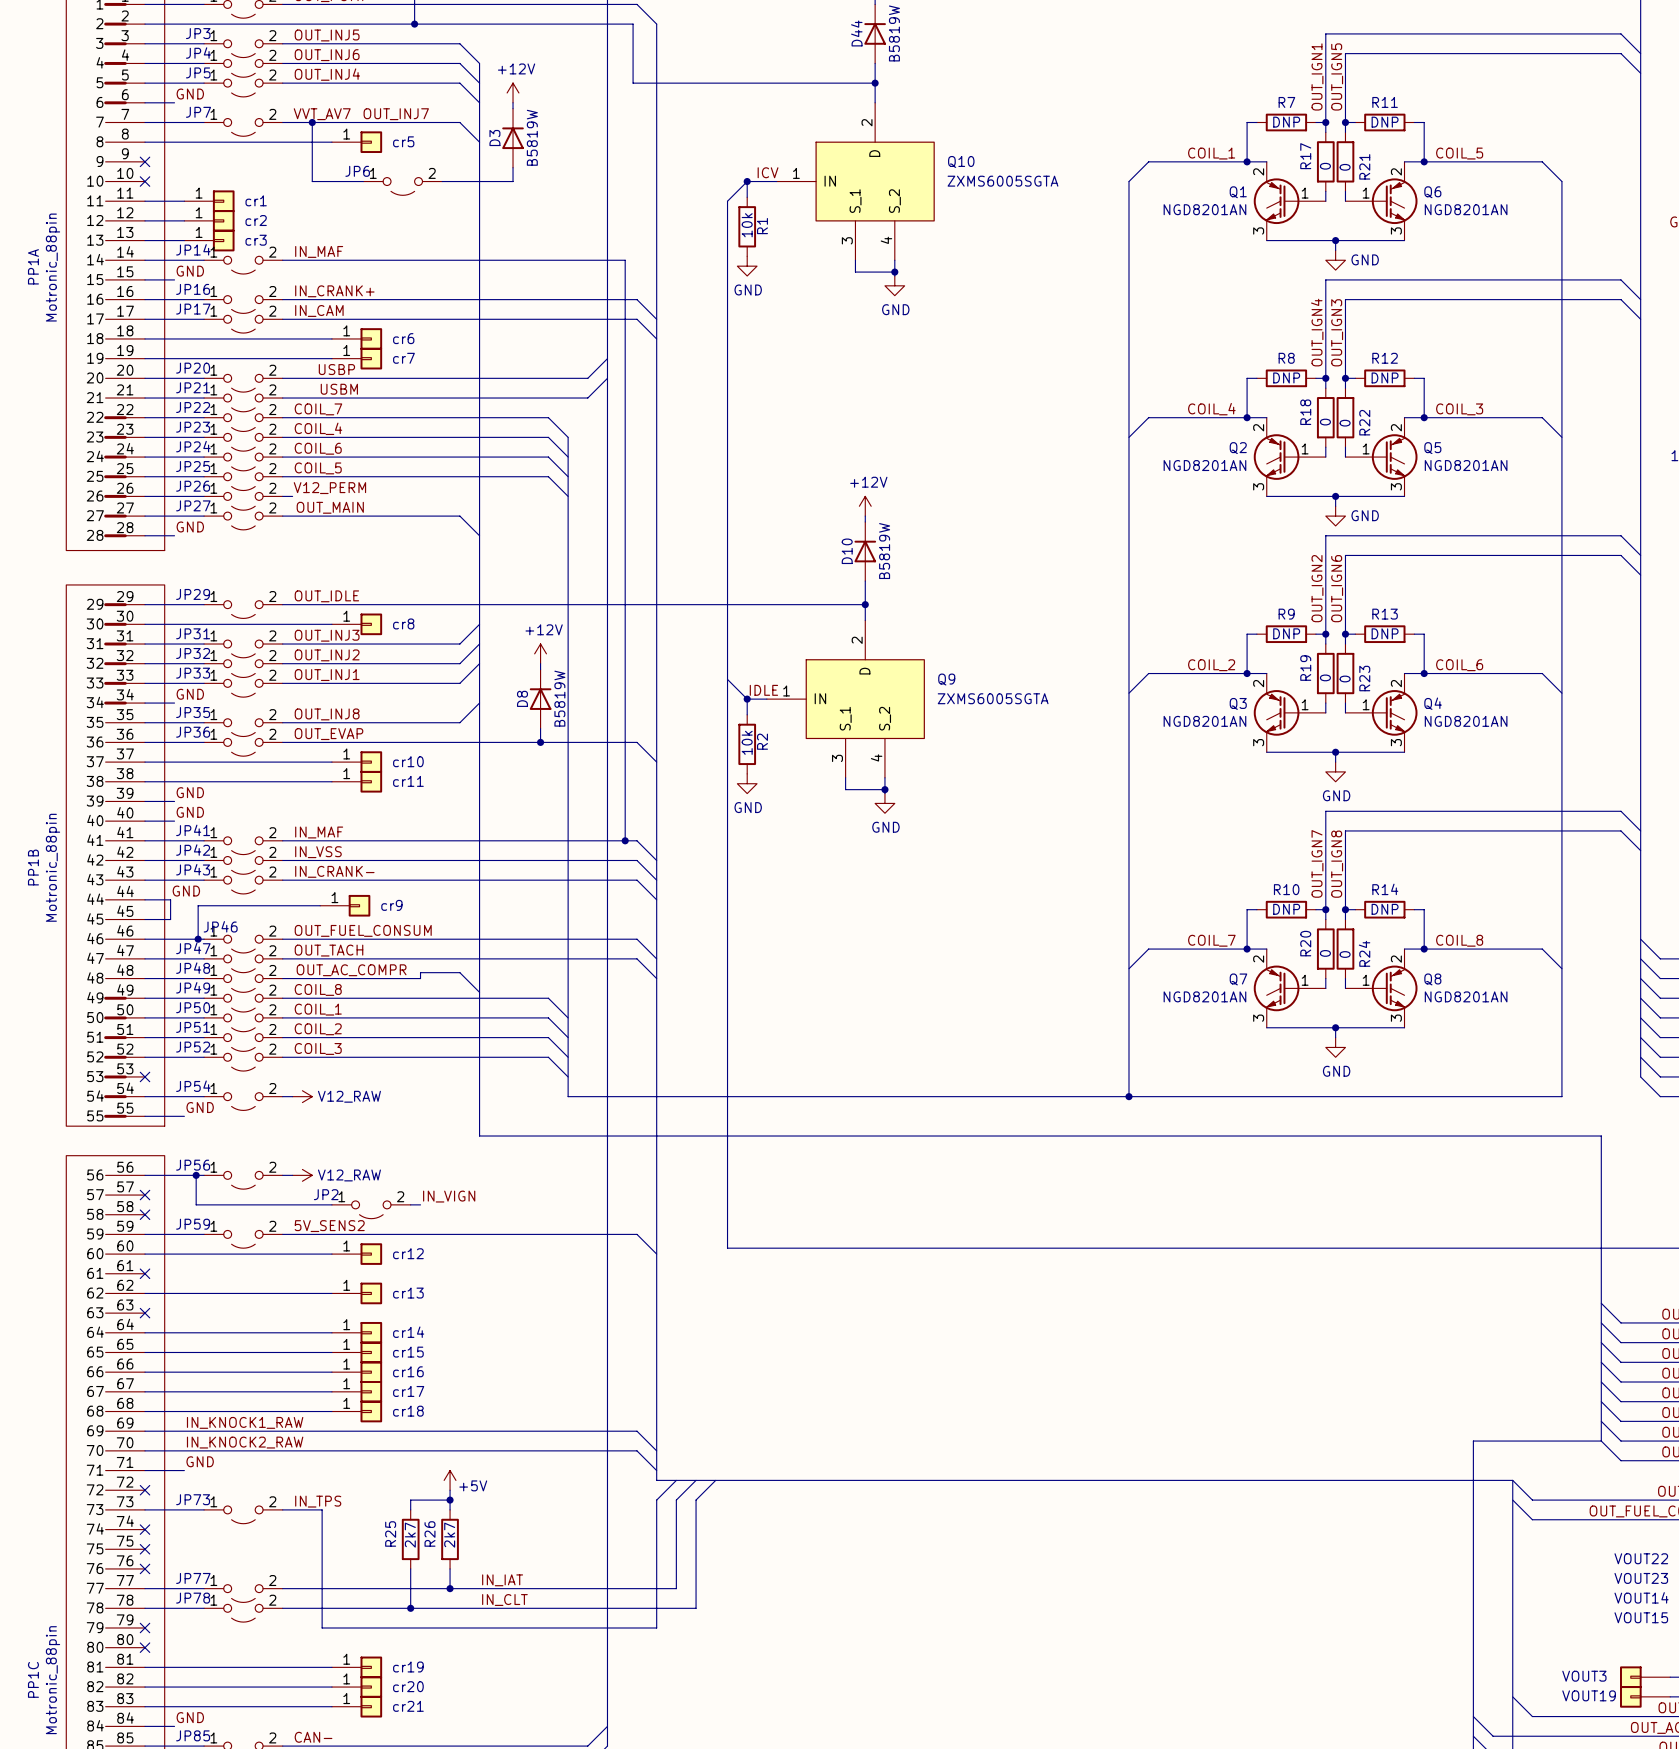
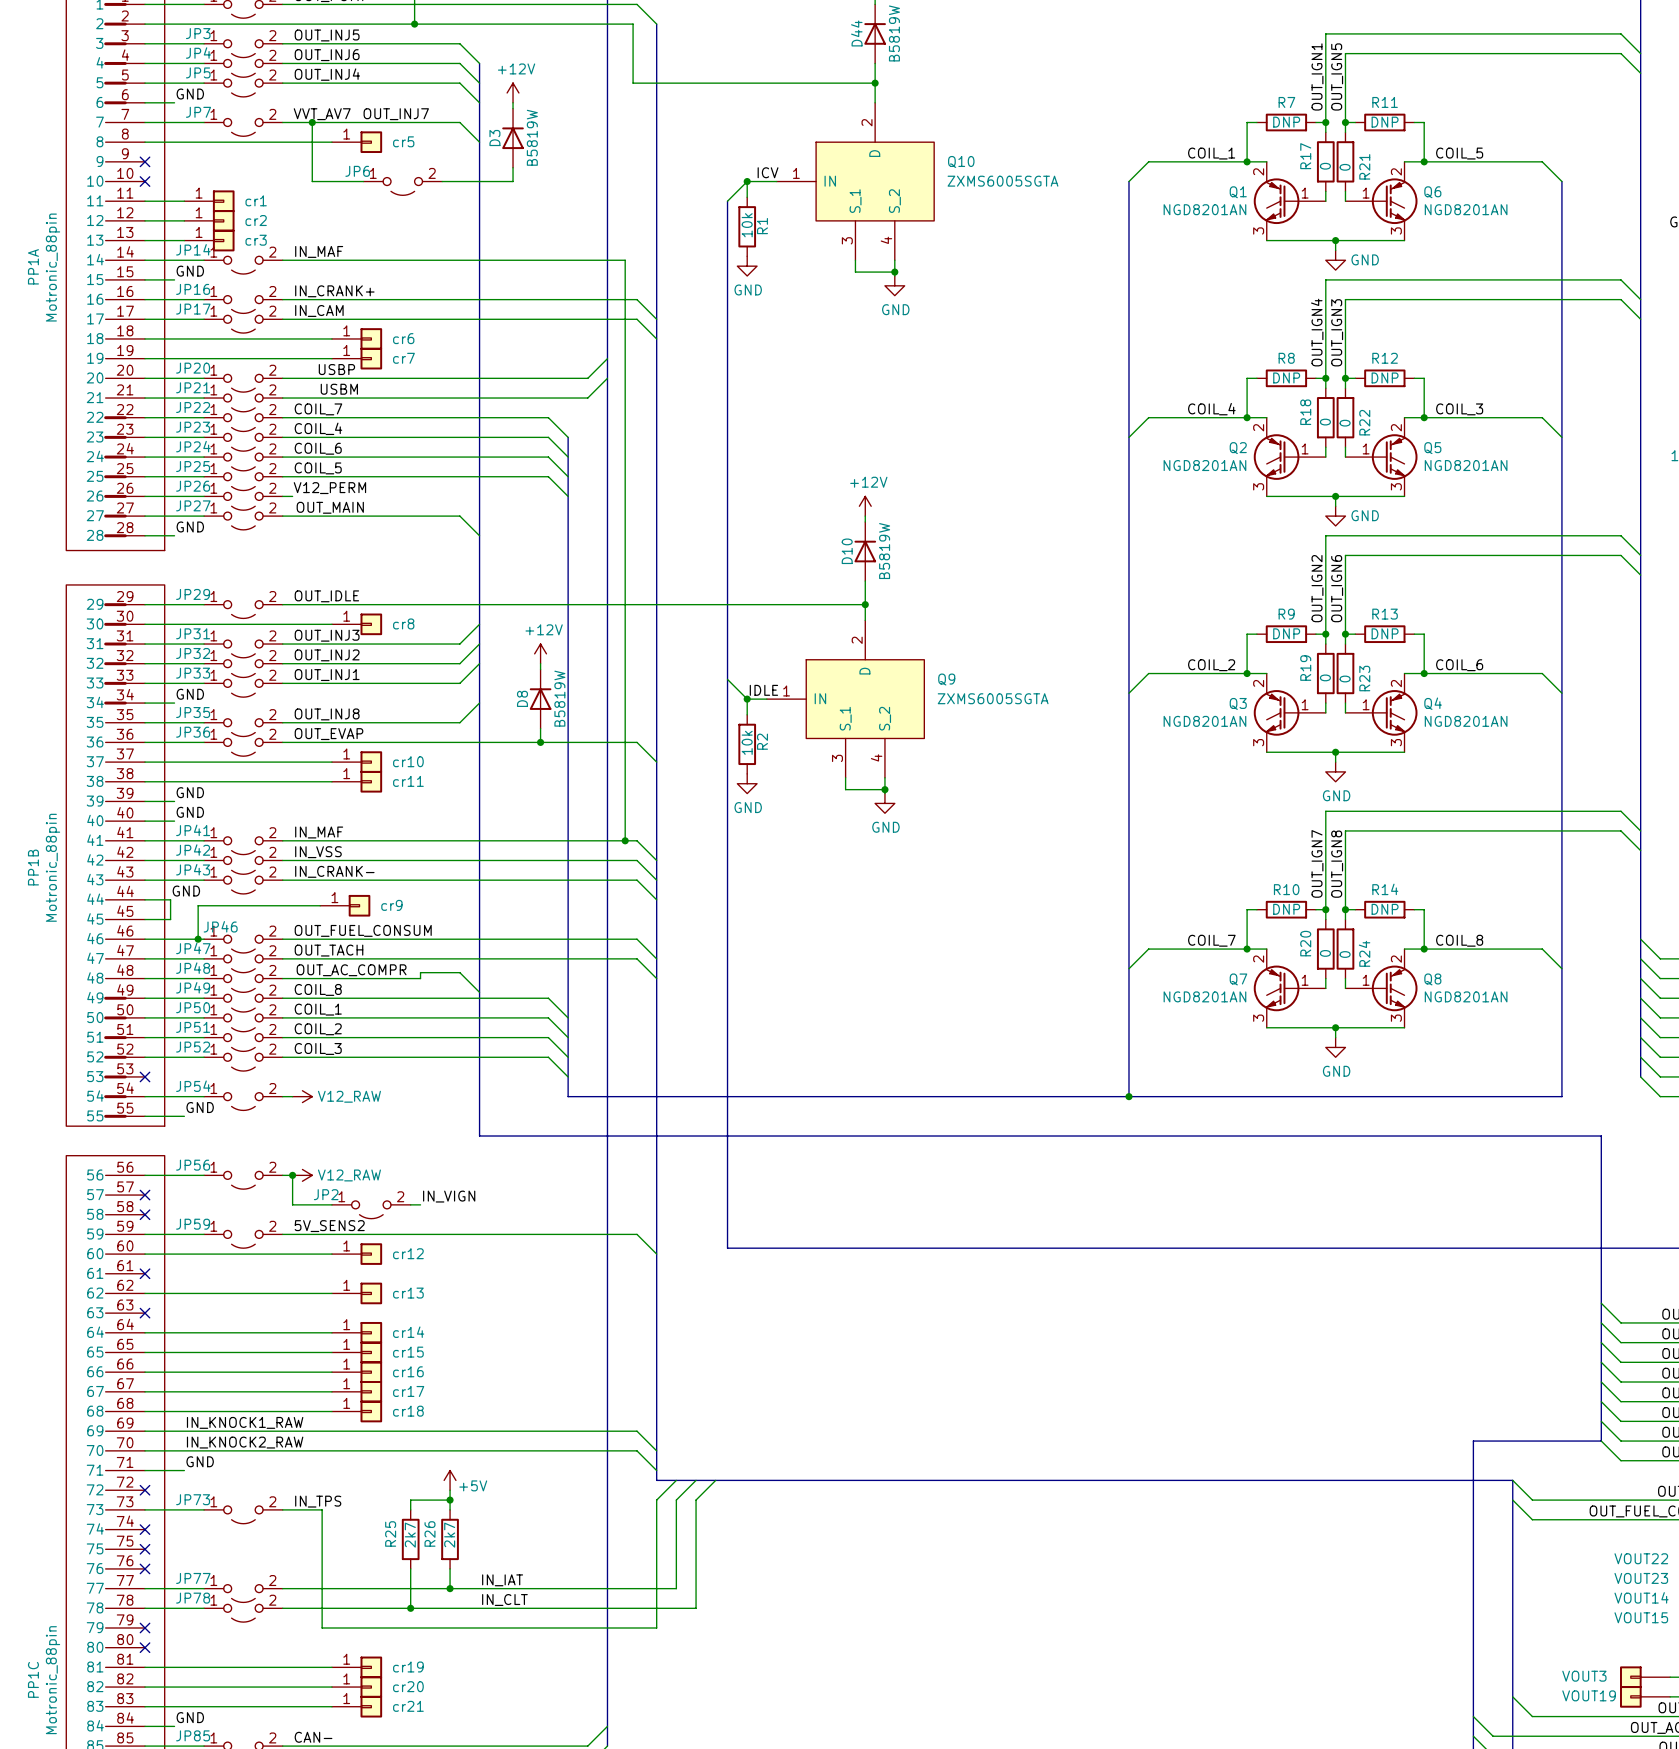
wire: (196, 1175) (196, 1204) (292, 1204) -> (292, 1175) (292, 1204)
junction: (196, 1175) -> none
junction: none -> (292, 1175)

